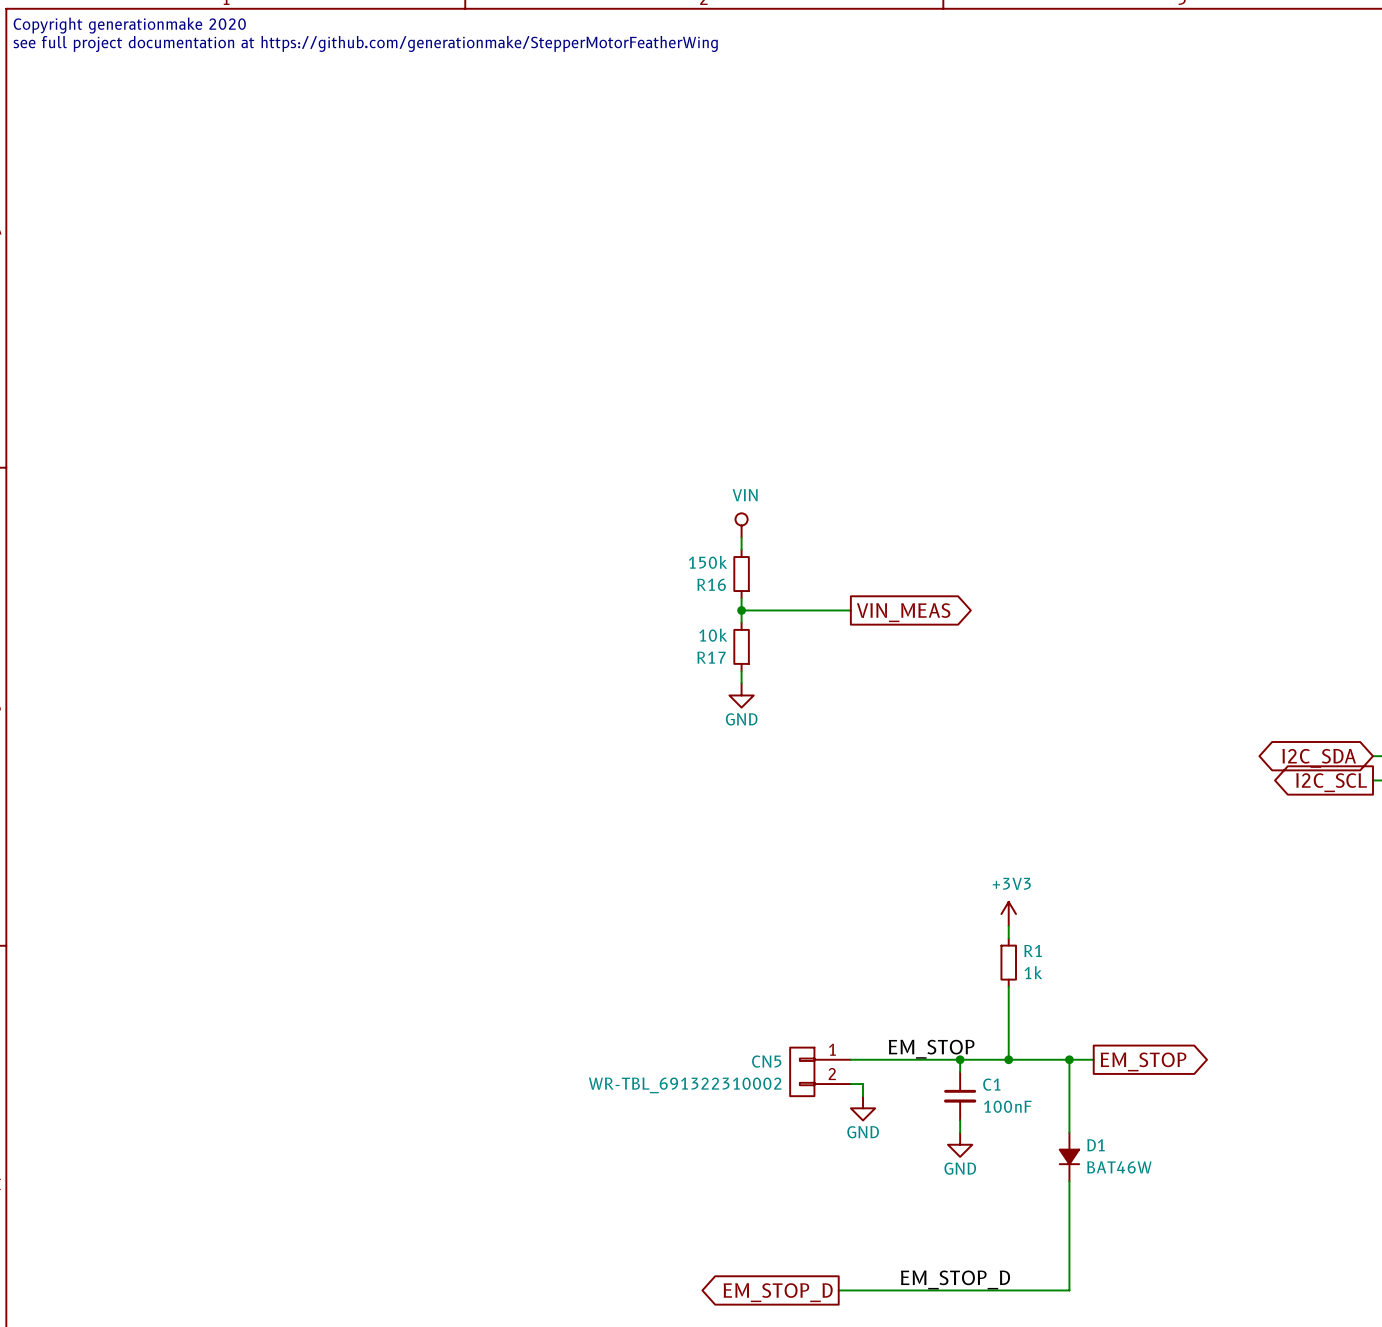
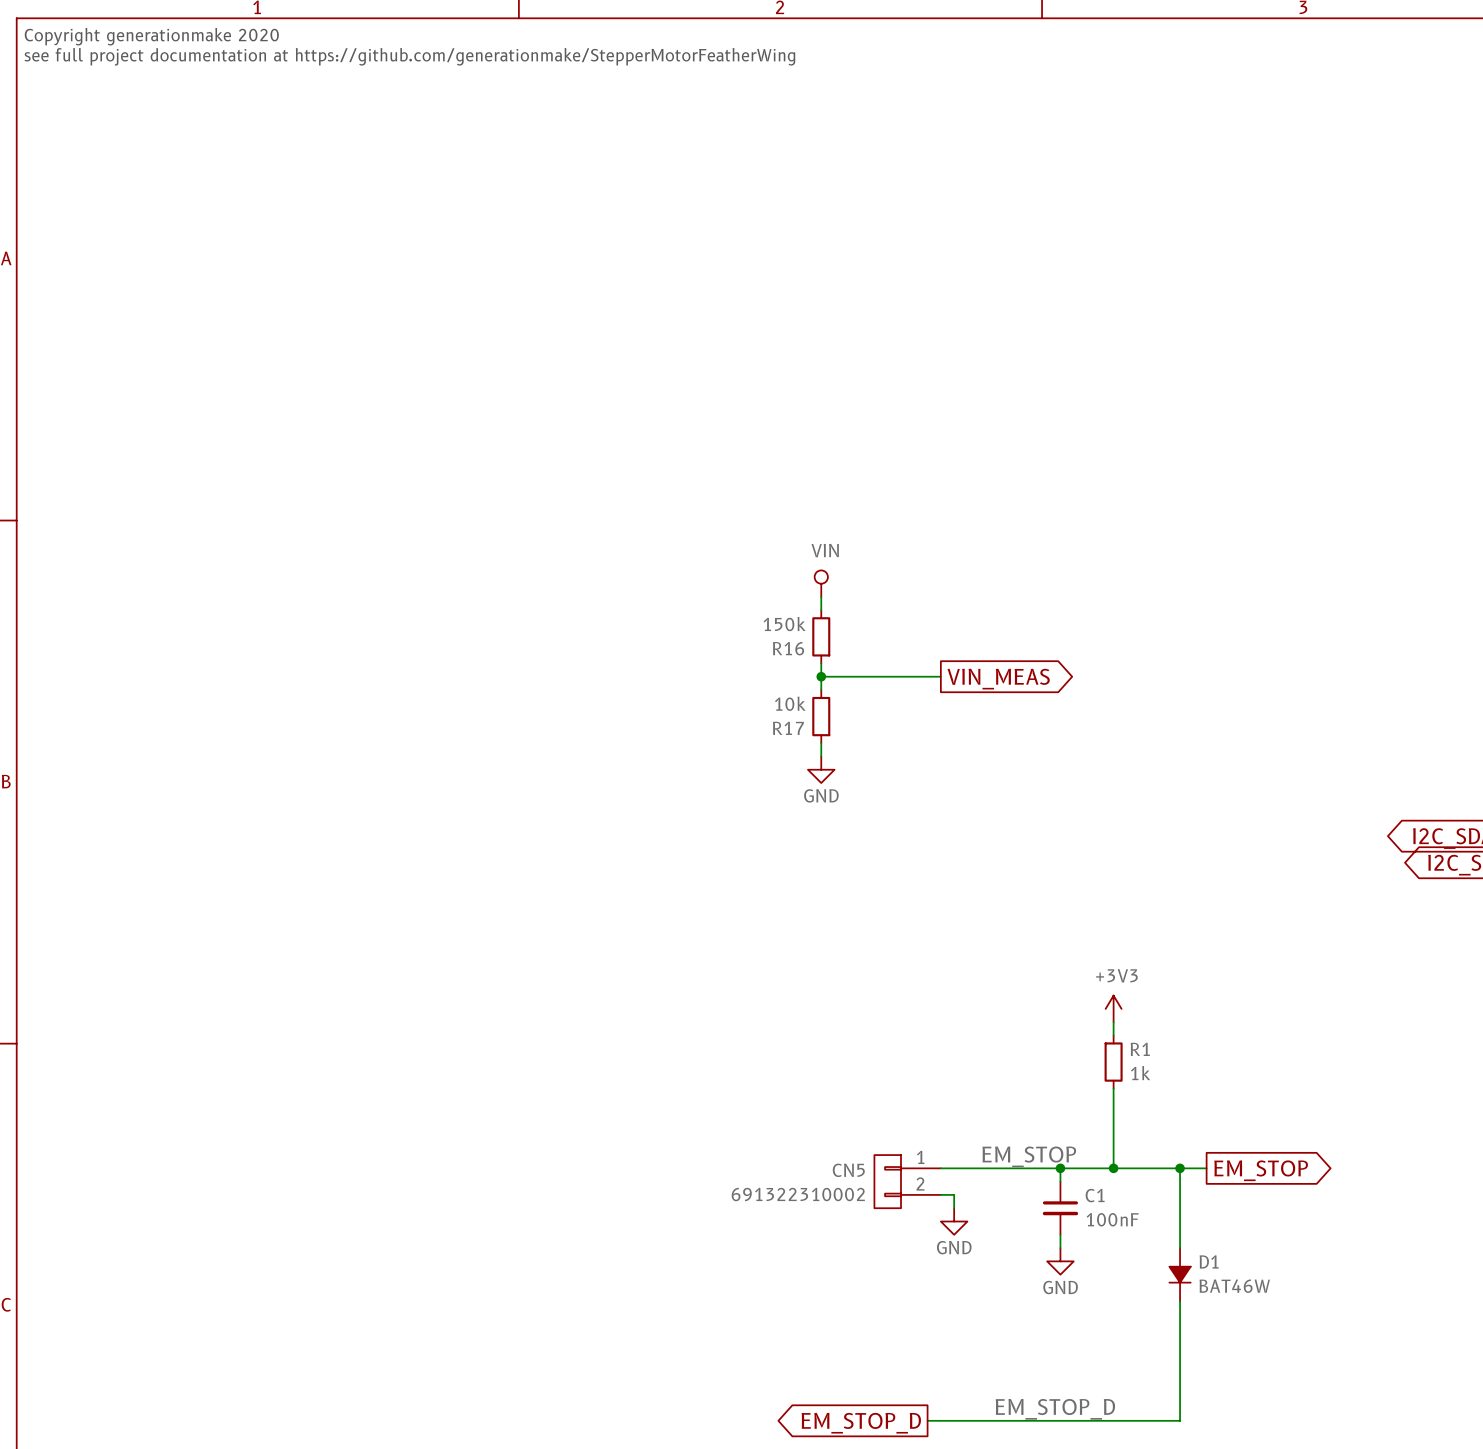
CN5 value: WR-TBL_691322310002 (685, 1085) -> 691322310002 (798, 1194)

